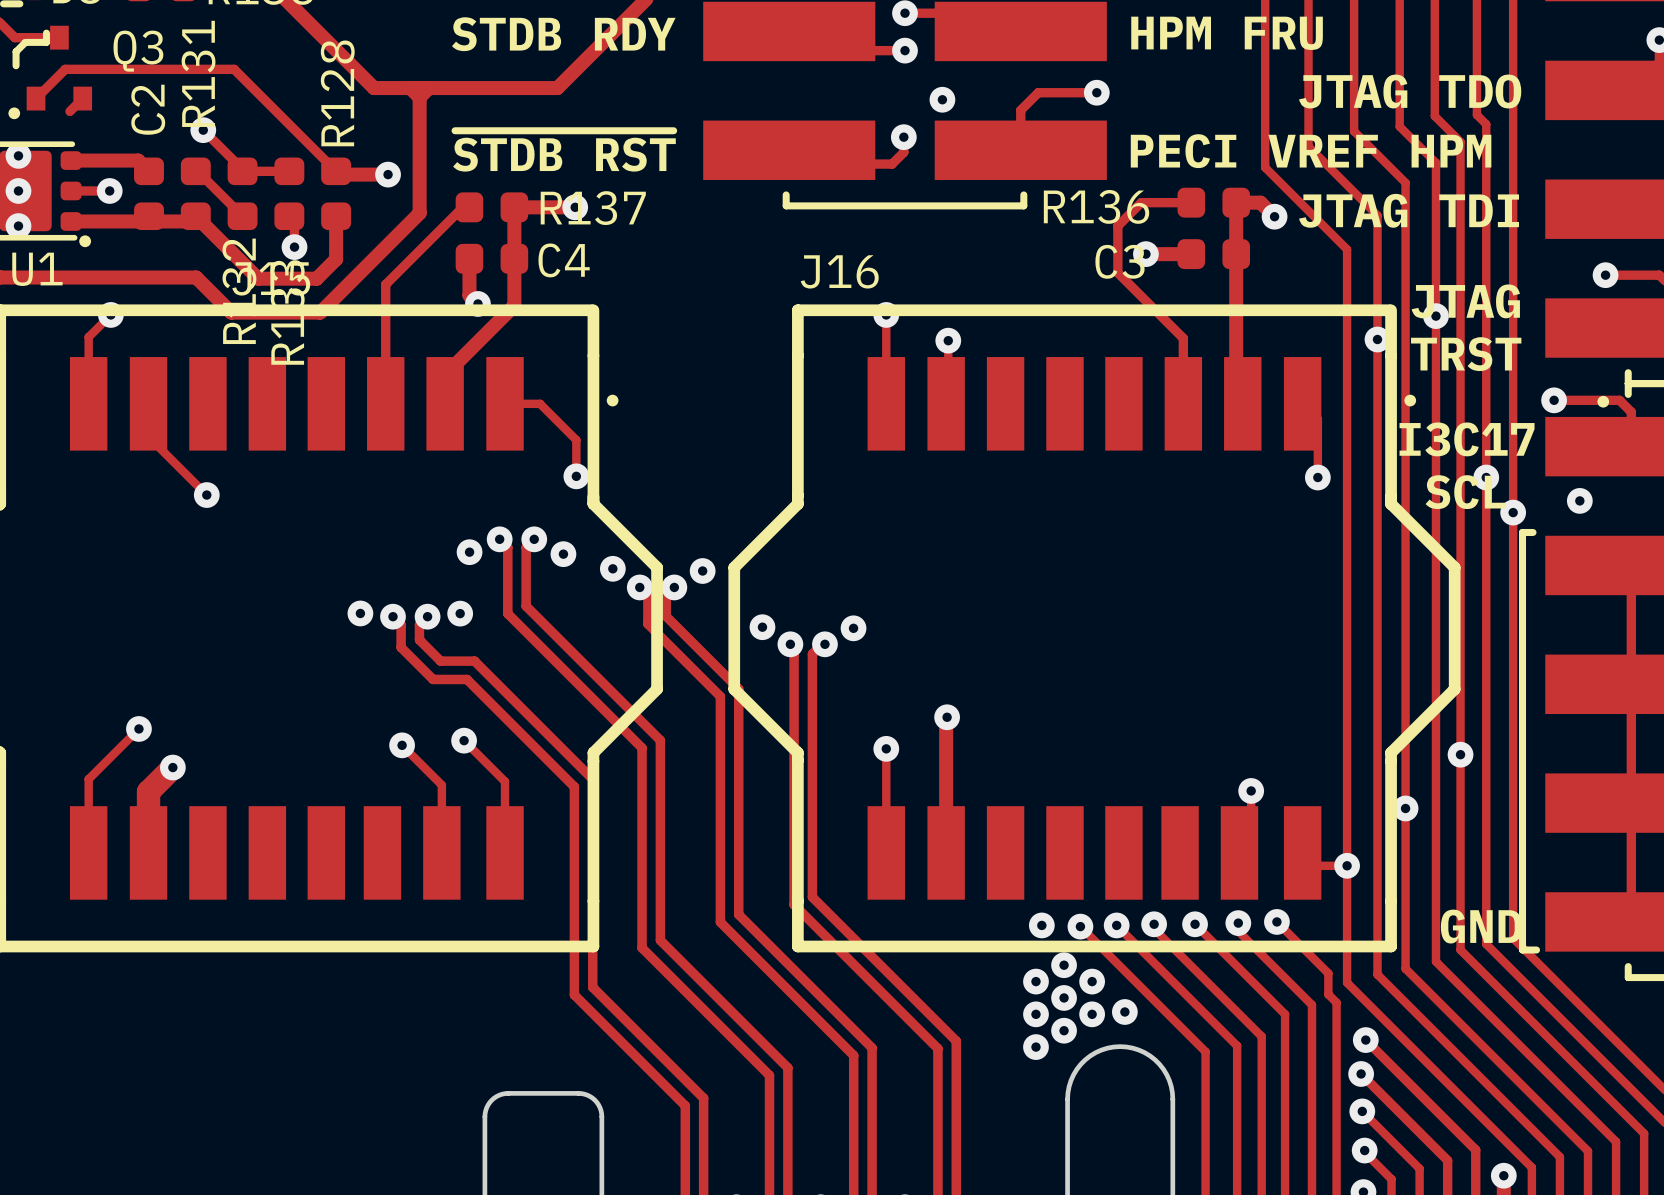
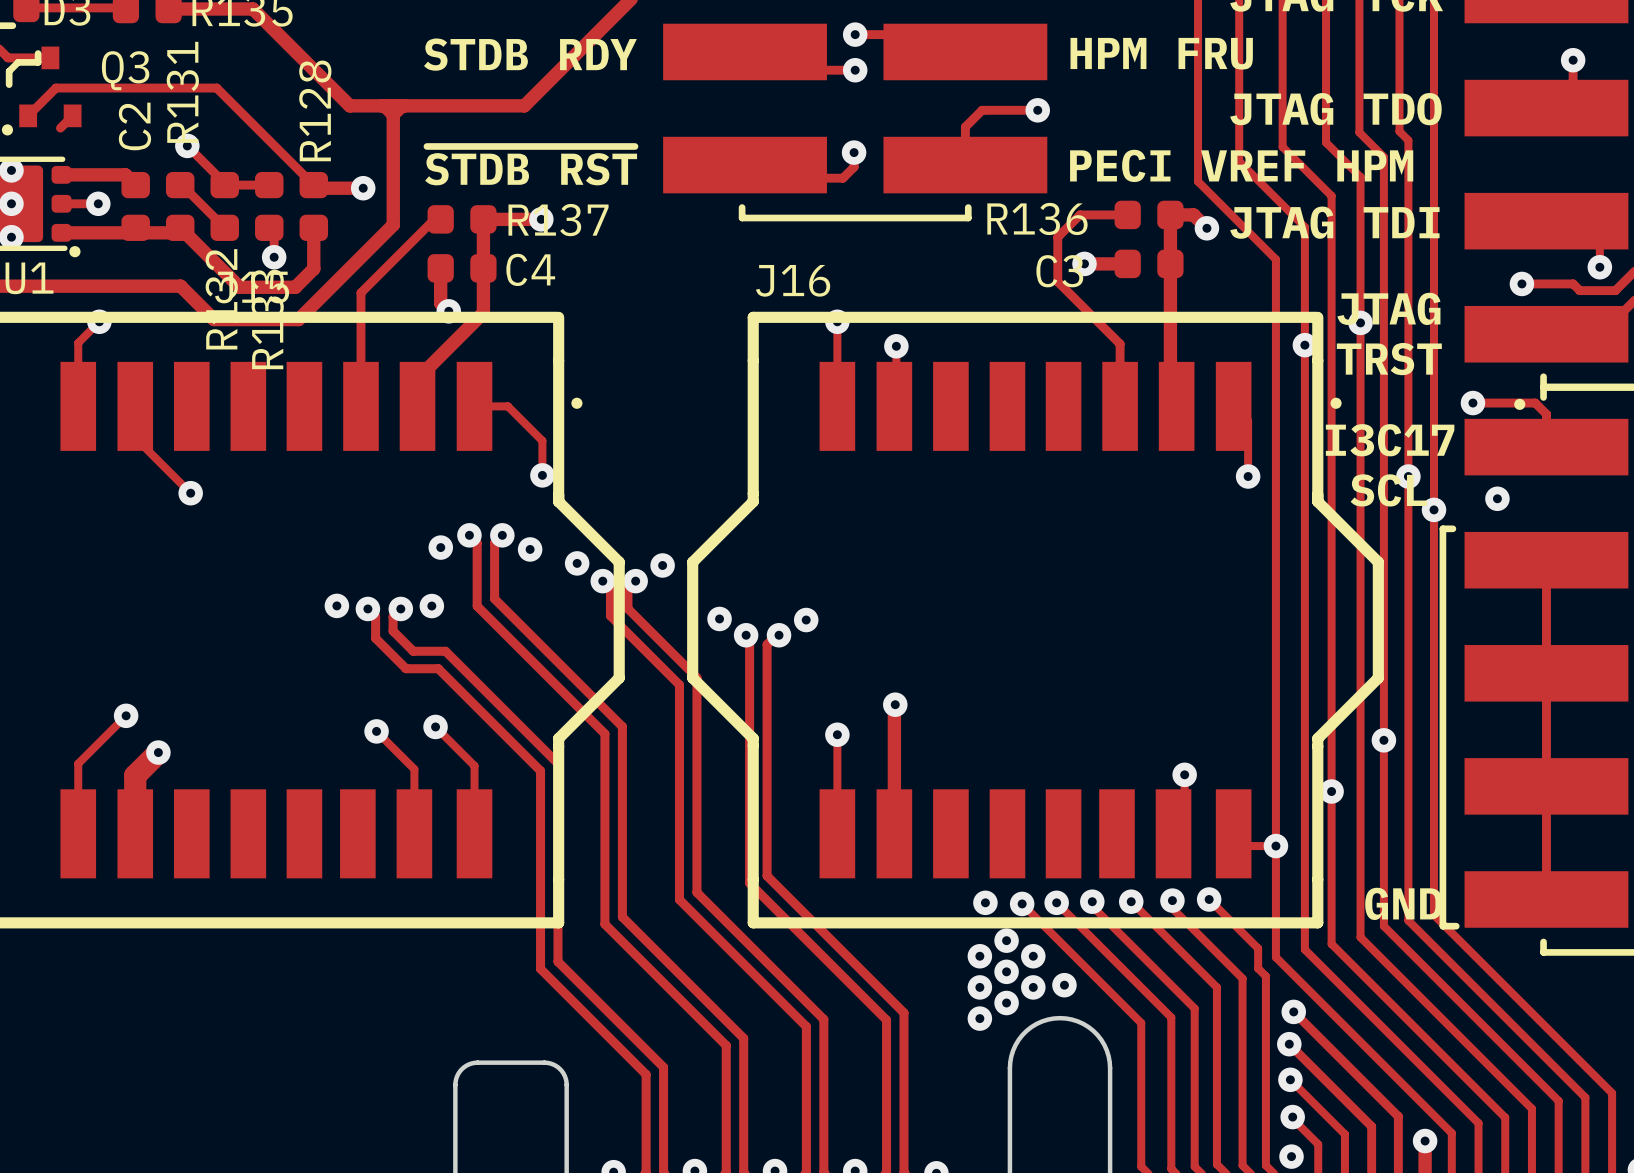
via: (942, 99) -> none

